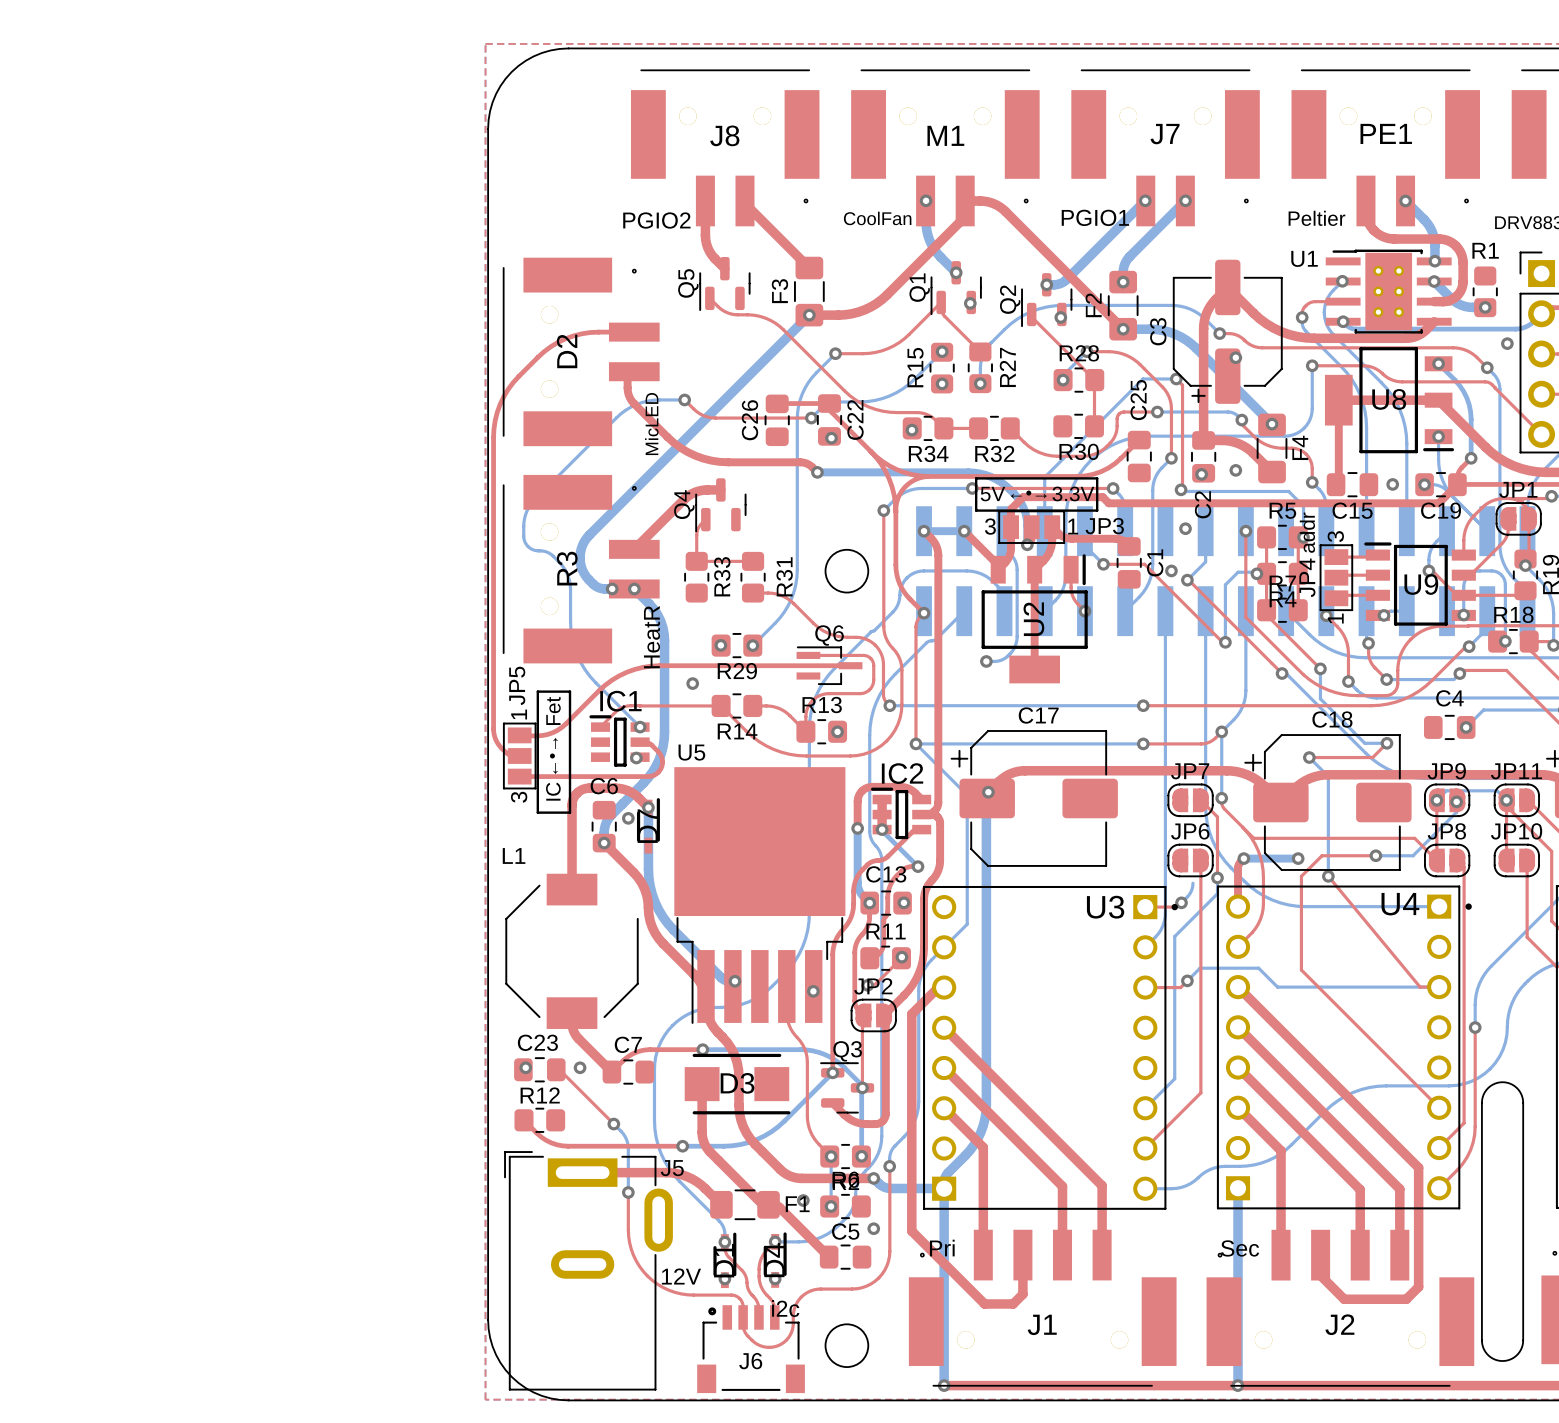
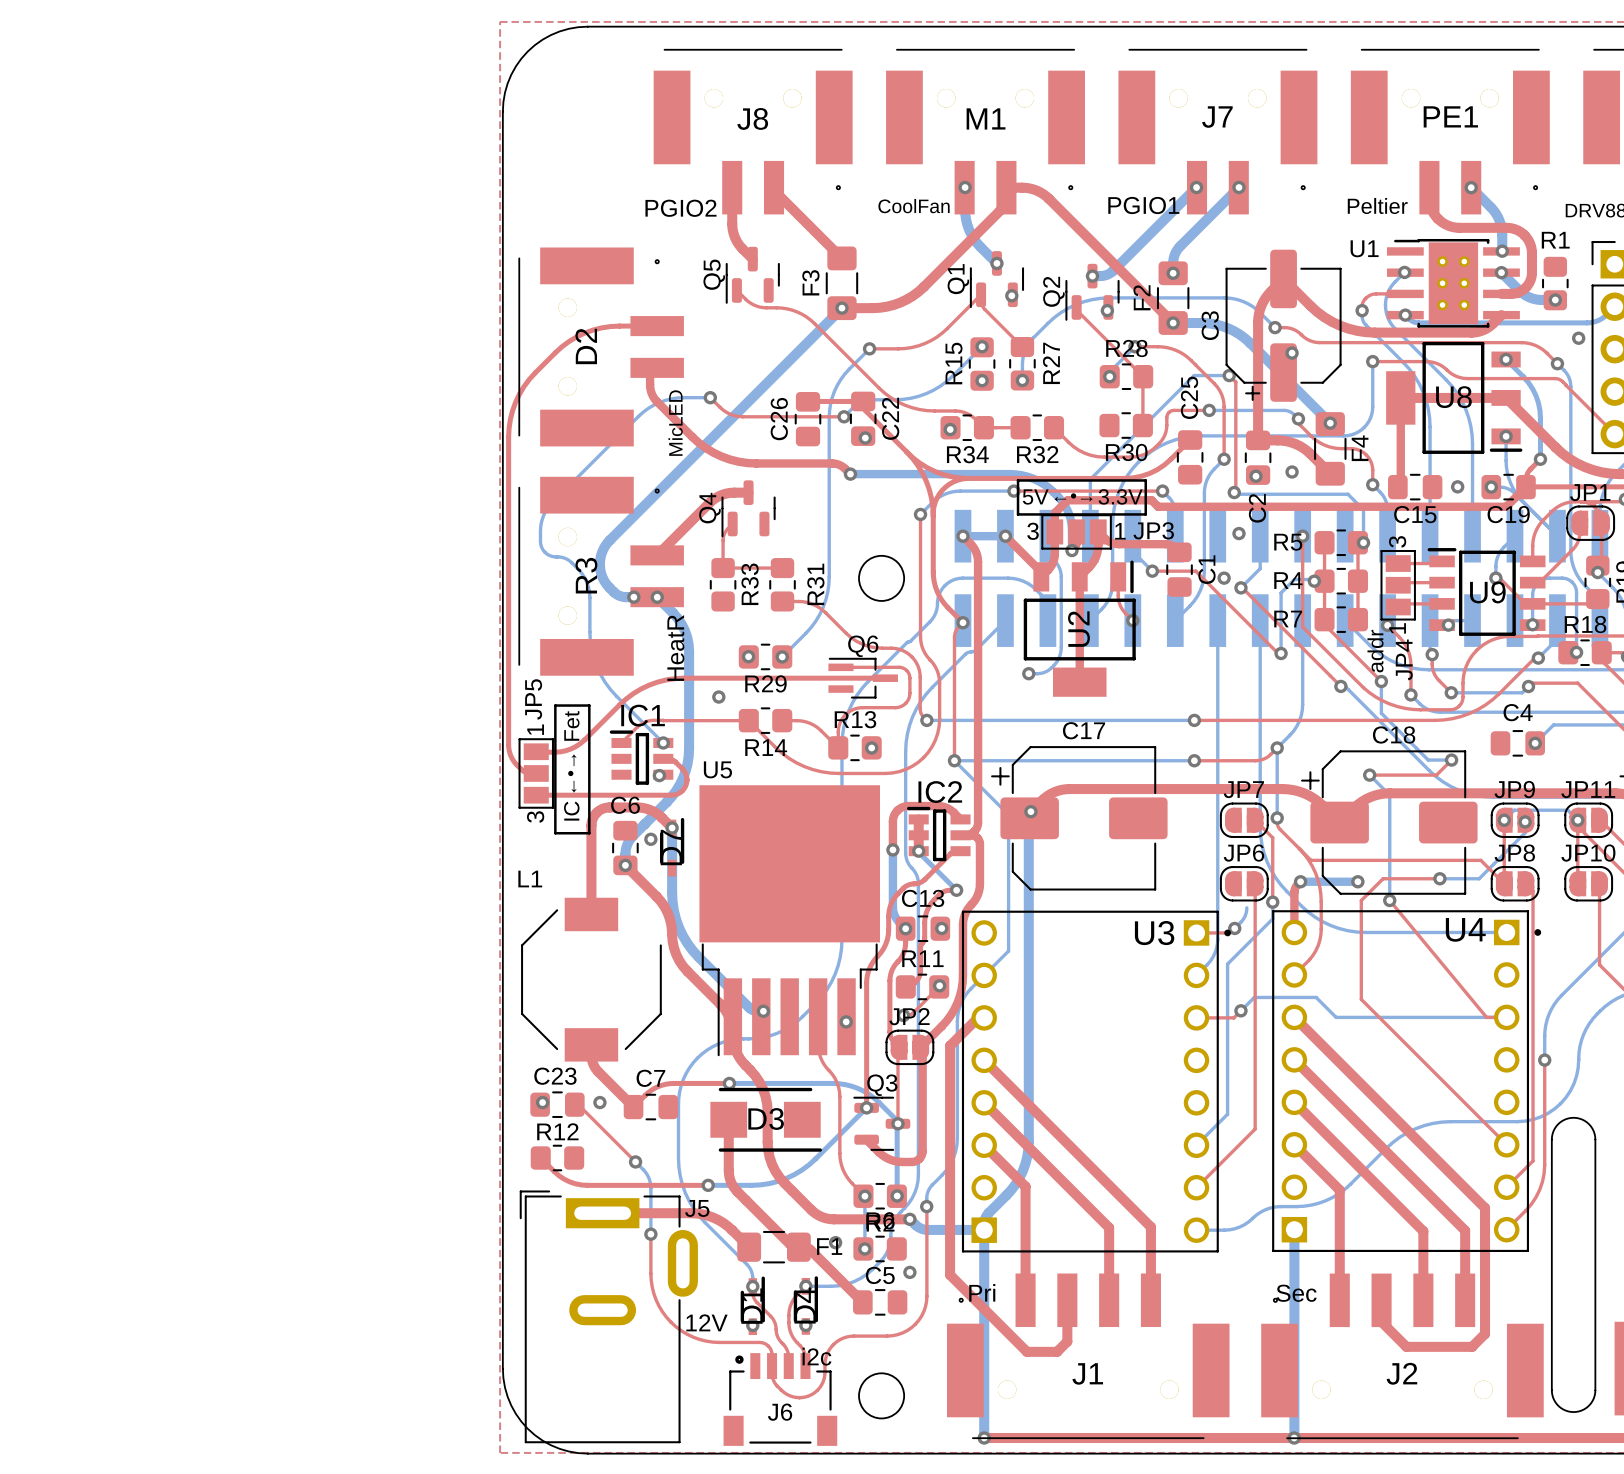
R5 name position: R5 (1282, 510) -> R5 (1288, 542)
text position: addr (1307, 532) -> addr (1375, 651)
JP4 name position: JP4 (1307, 577) -> JP4 (1404, 659)
R7 name position: R7 (1282, 583) -> R7 (1288, 619)
R4 name position: R4 (1283, 599) -> R4 (1288, 580)

